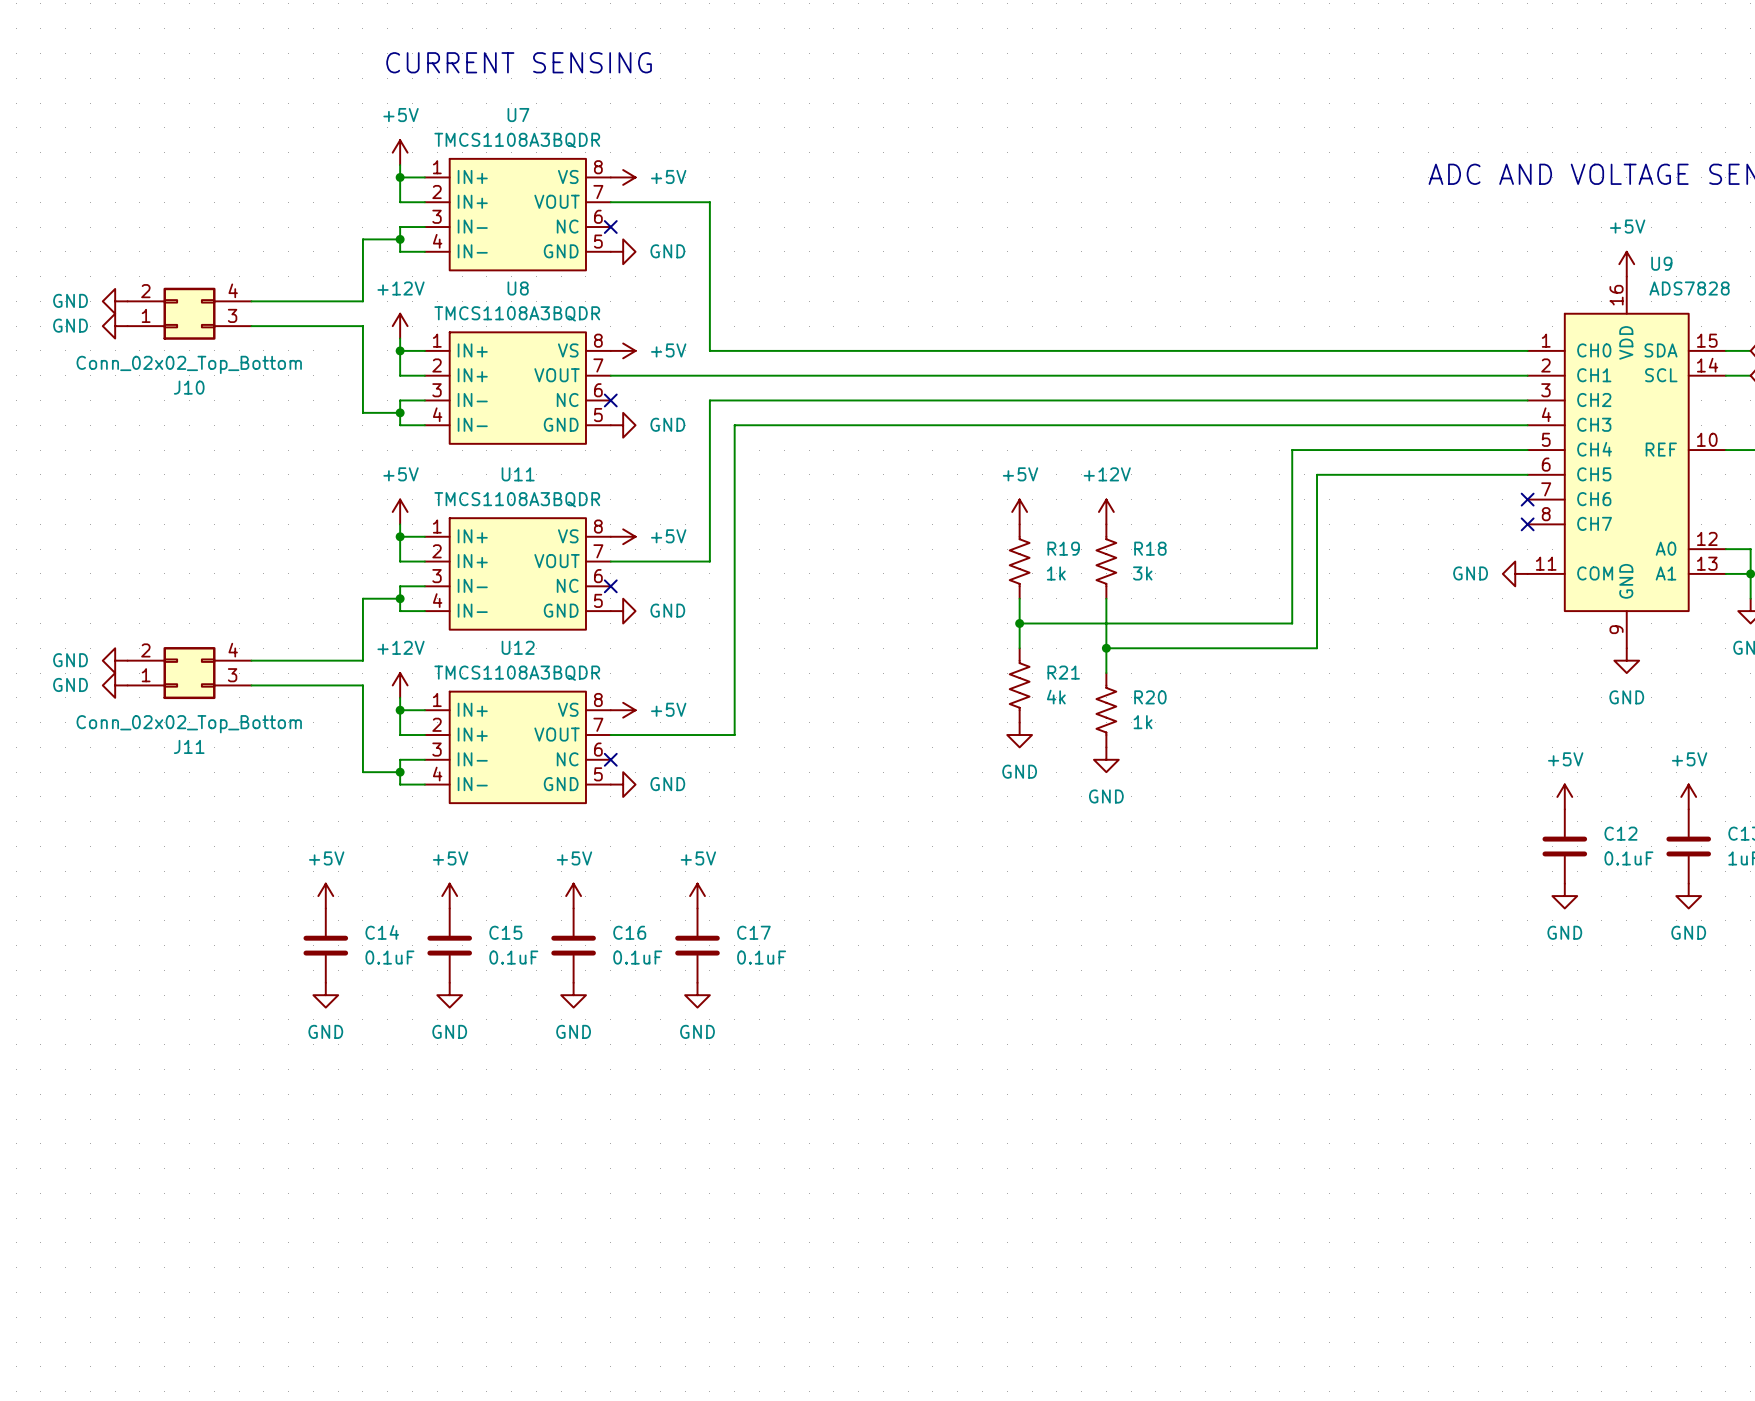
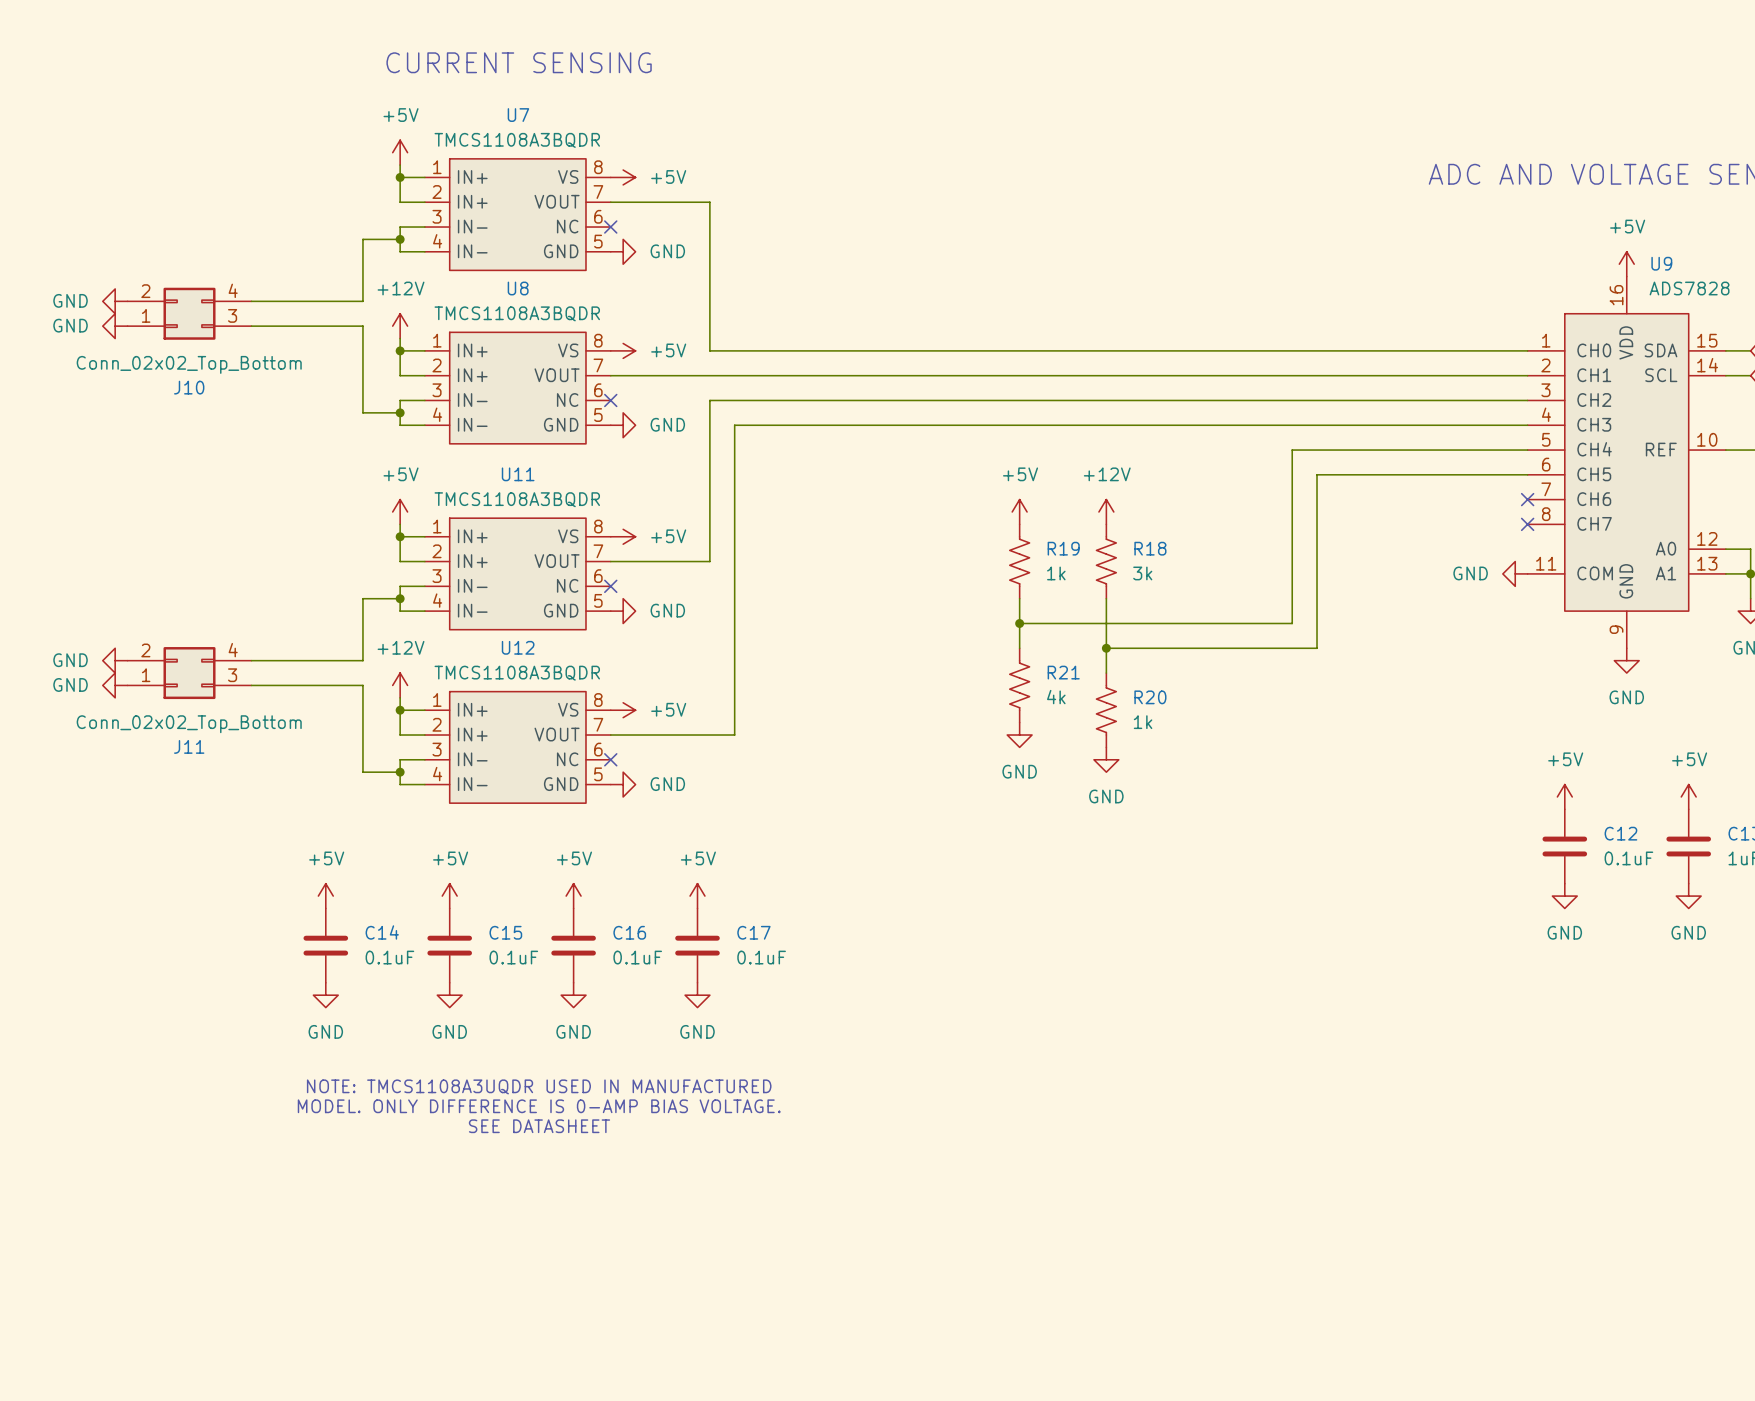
text: none -> NOTE: TMCS1108A3UQDR USED IN MANUFACTURED (539, 1086)
text: none -> MODEL. ONLY DIFFERENCE IS 0-AMP BIAS VOLTAGE. (539, 1106)
text: none -> SEE DATASHEET (539, 1126)

